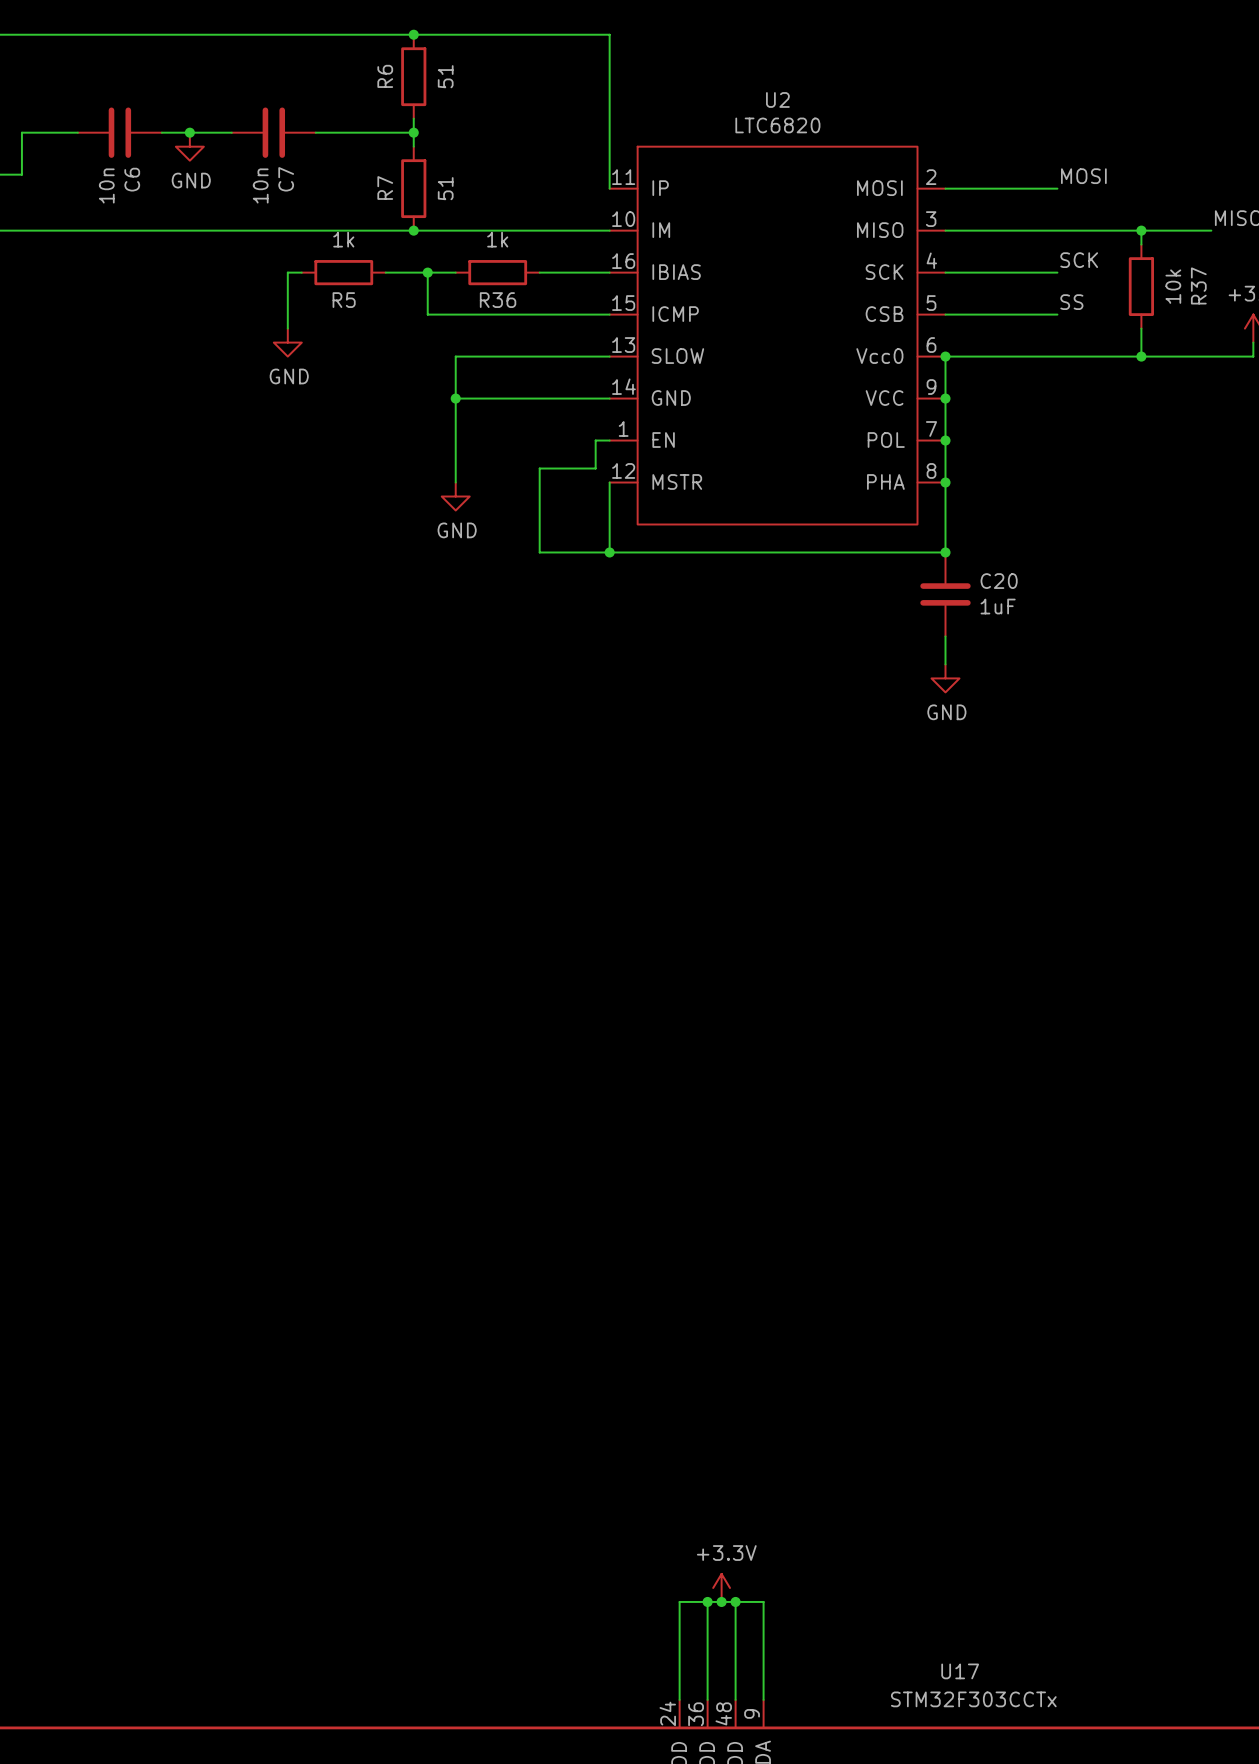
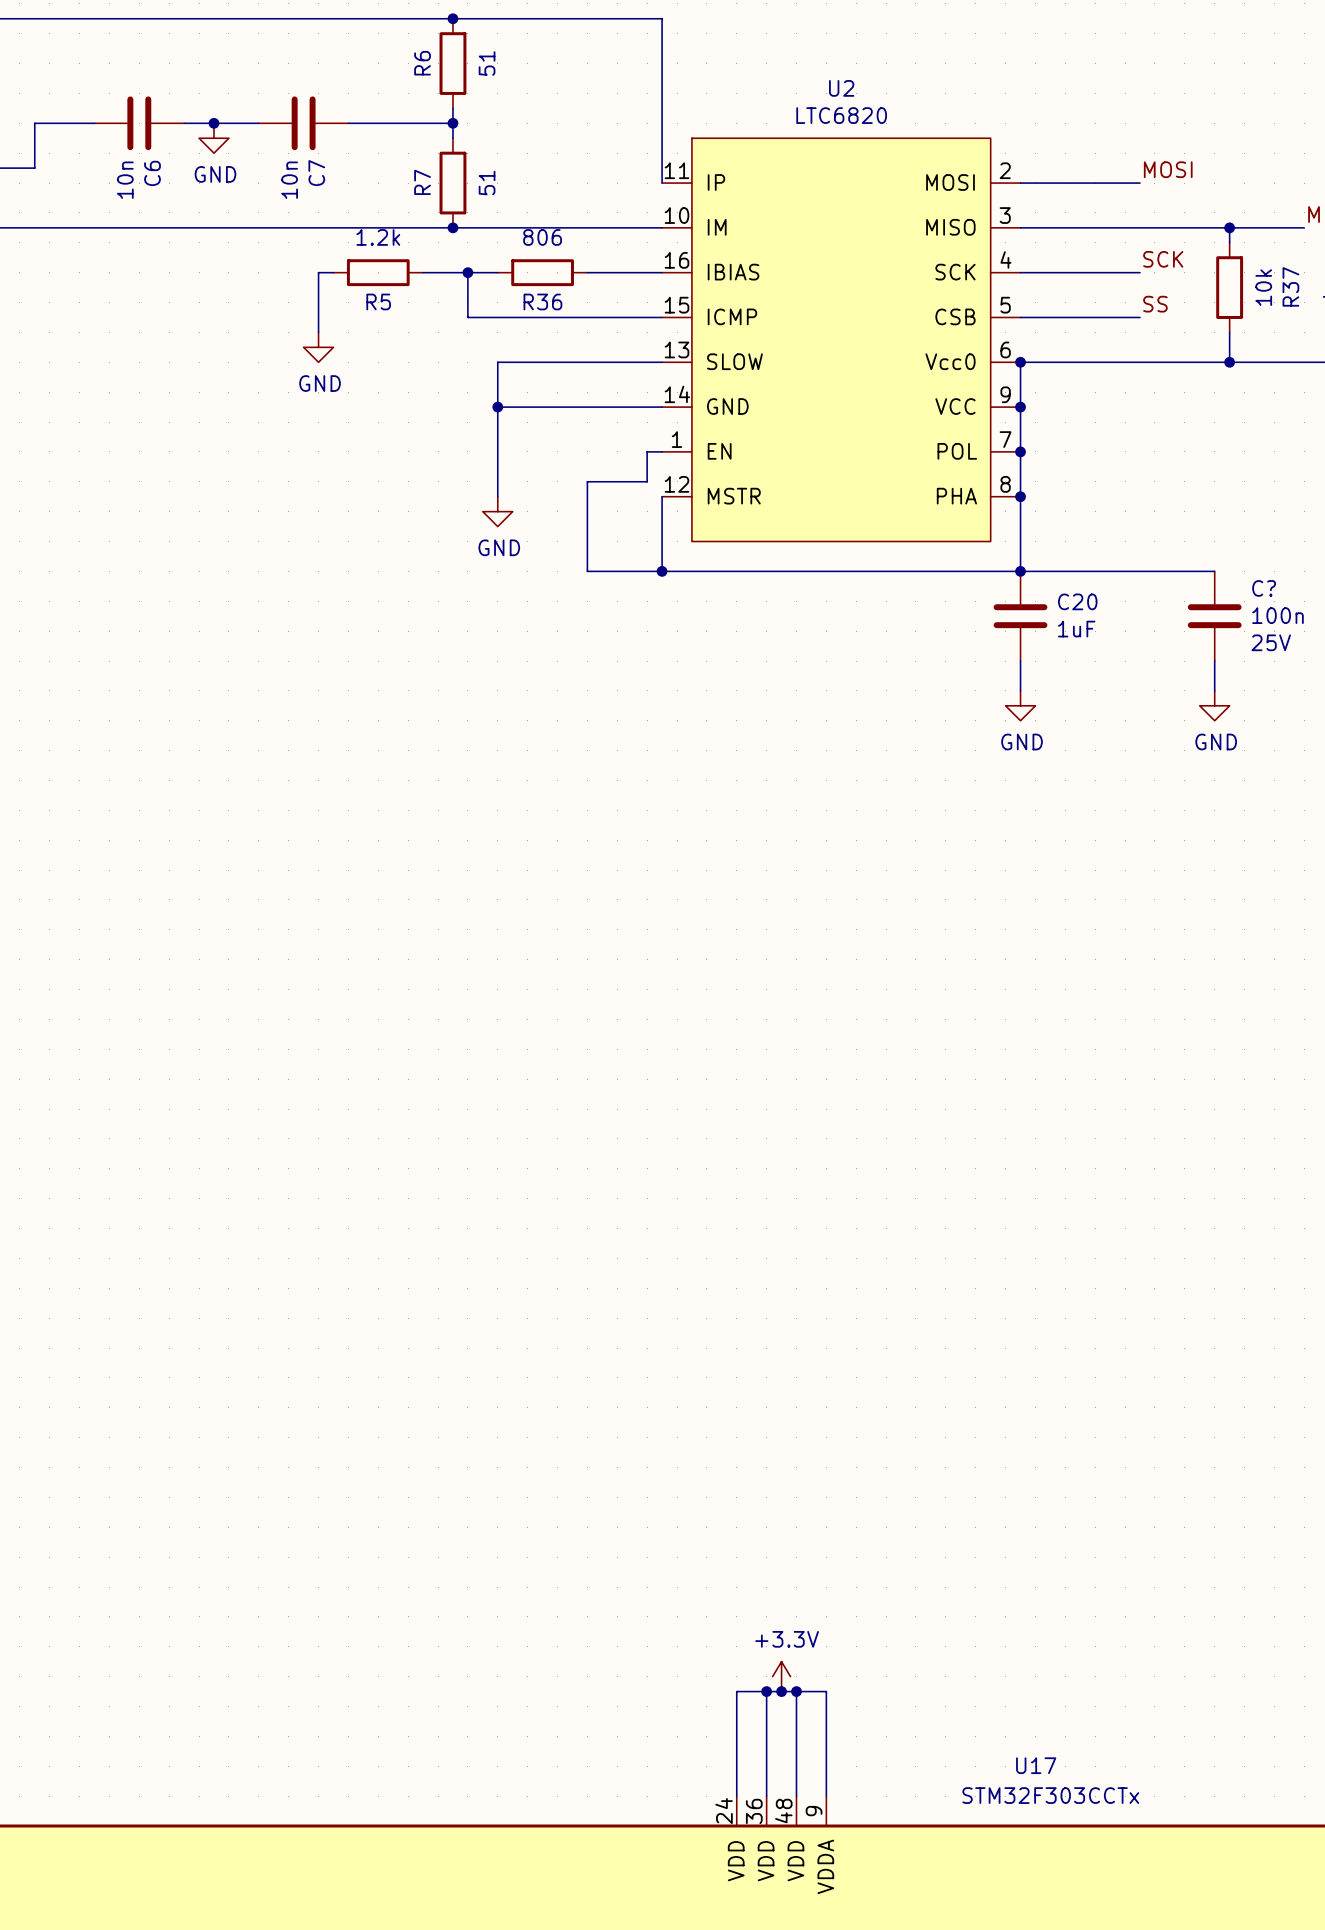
R5 value: 1k (343, 239) -> 1.2k (378, 237)
R36 value: 1k (497, 239) -> 806 (542, 237)
wire: none -> (1020, 571) (1214, 571)
C?: none -> 100n (1214, 616)
wire: none -> (1214, 661) (1214, 690)
power symbol: none -> GND (1214, 705)

